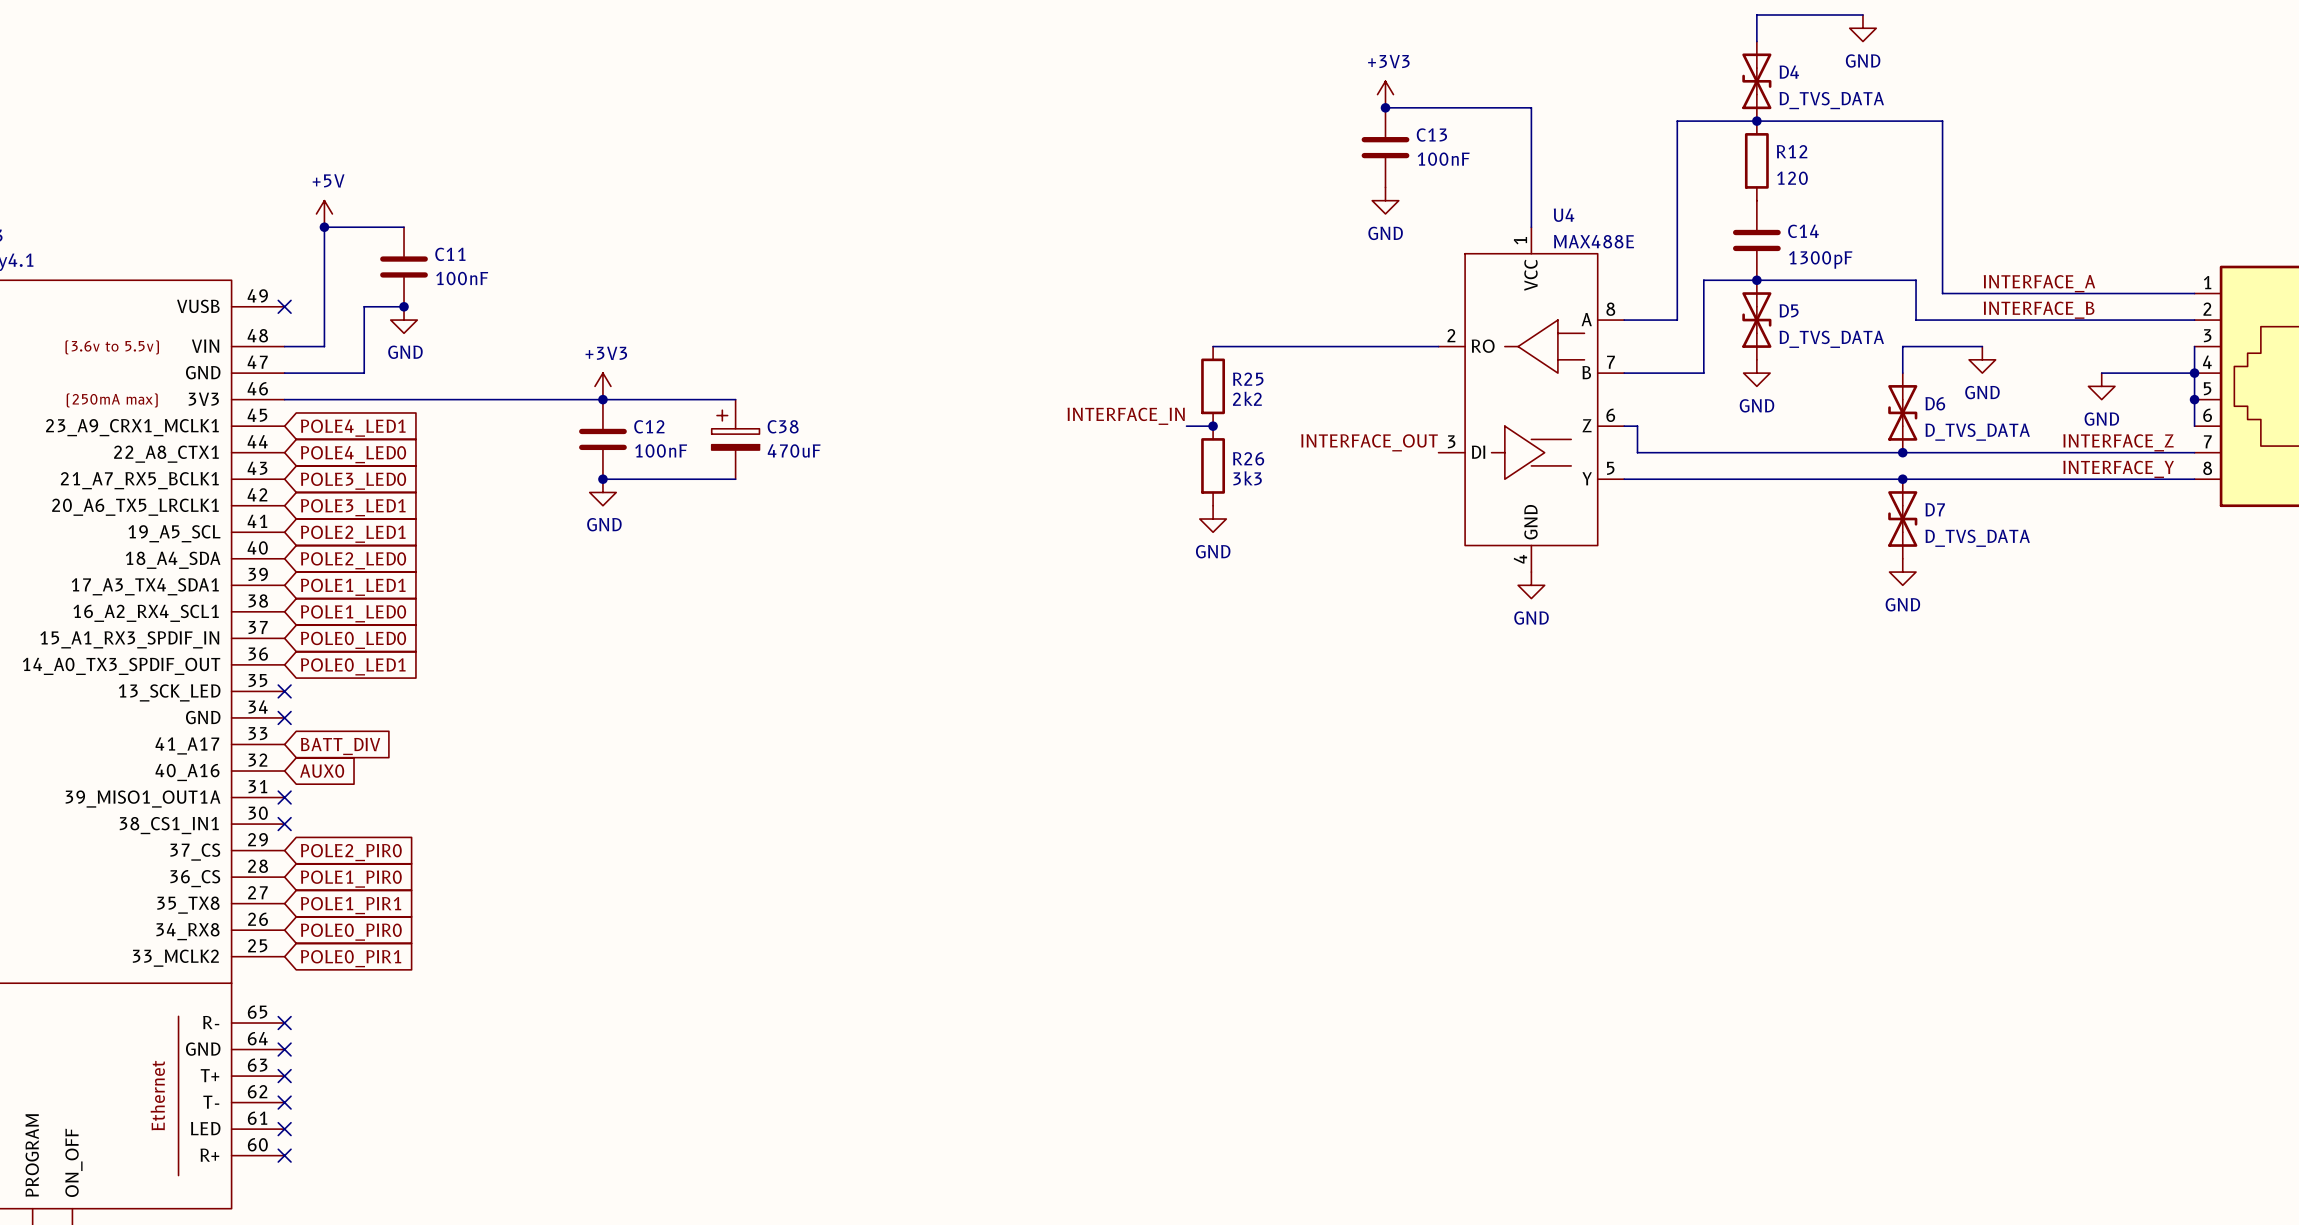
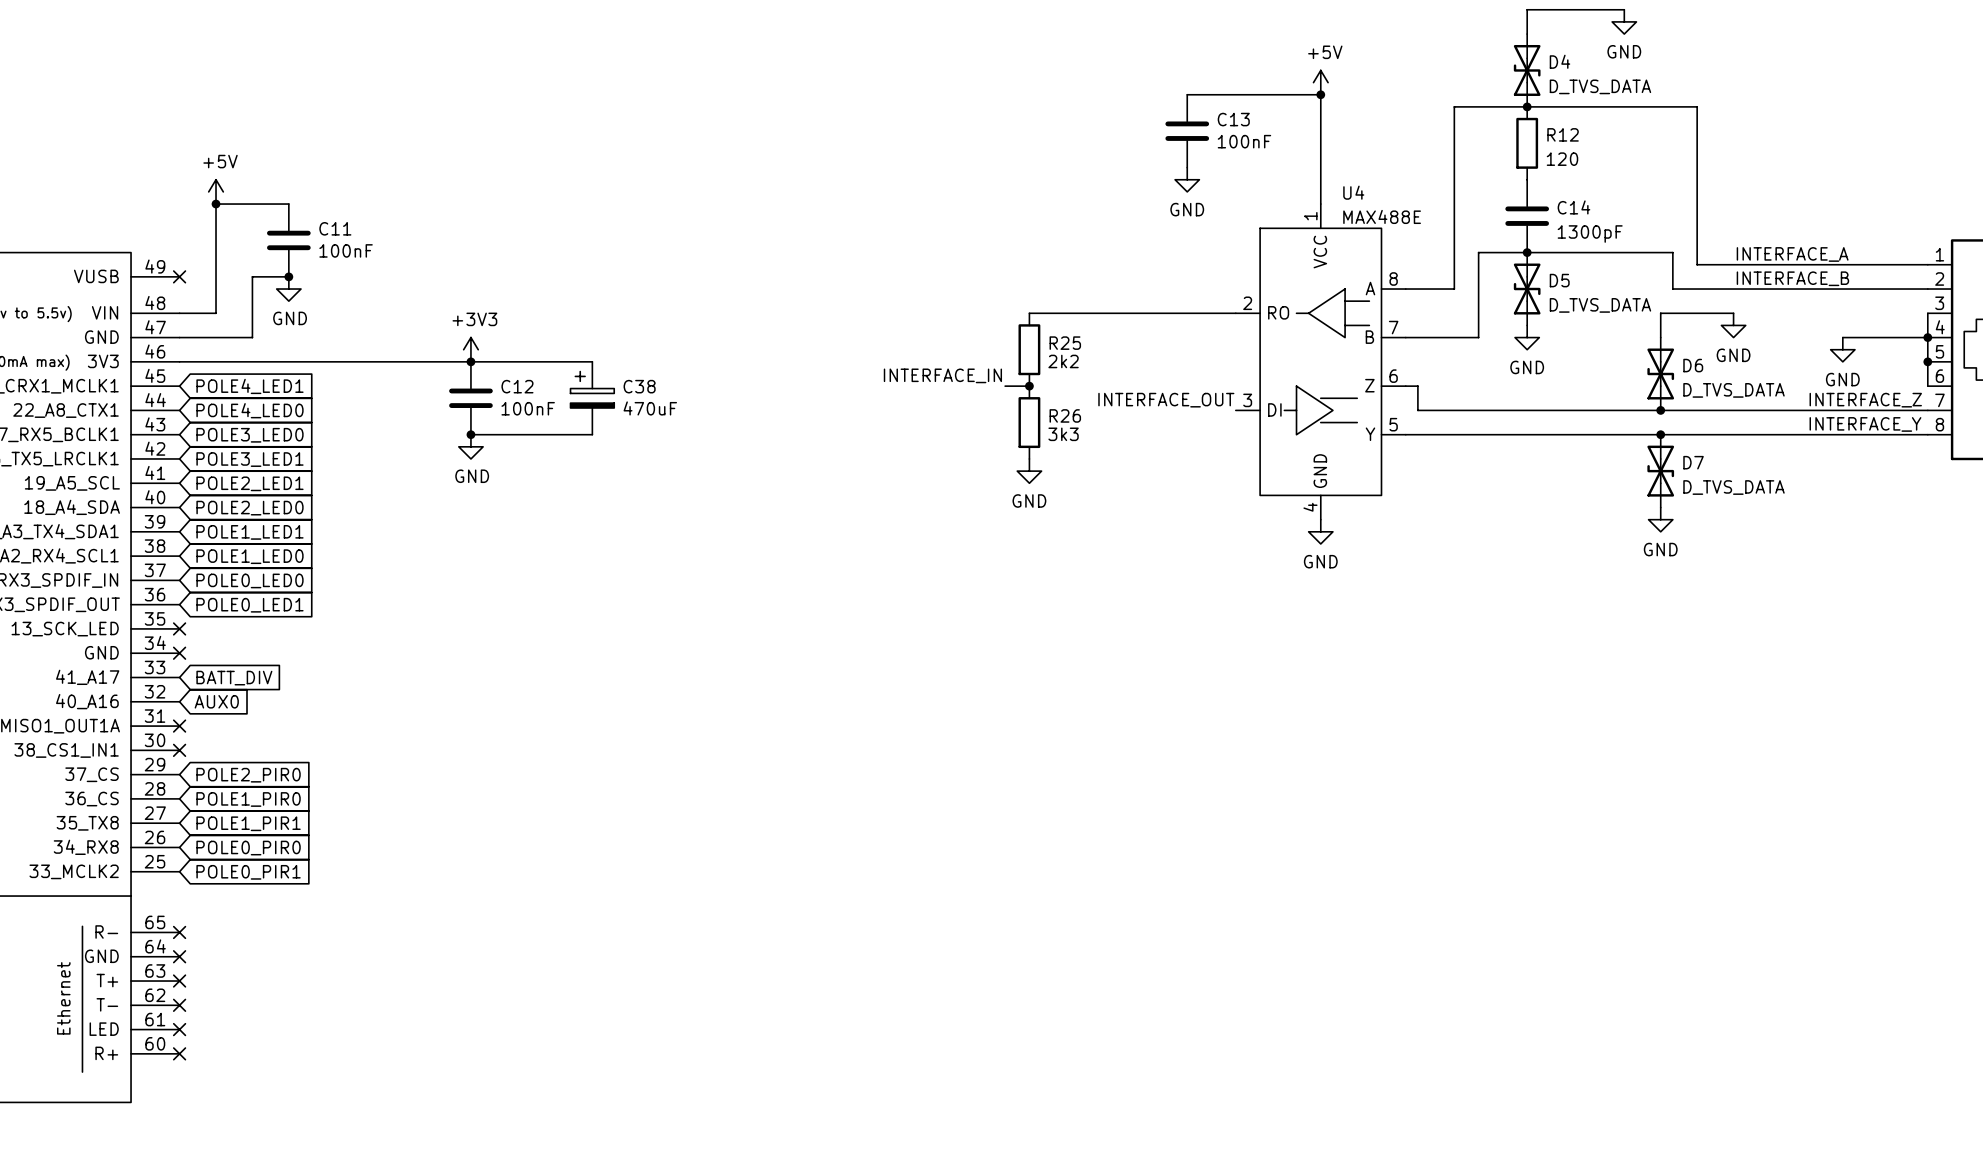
power symbol: +3V3 (1385, 94) -> none
power symbol: none -> +5V (1320, 82)
junction: (1385, 107) -> none
junction: none -> (1320, 94)

